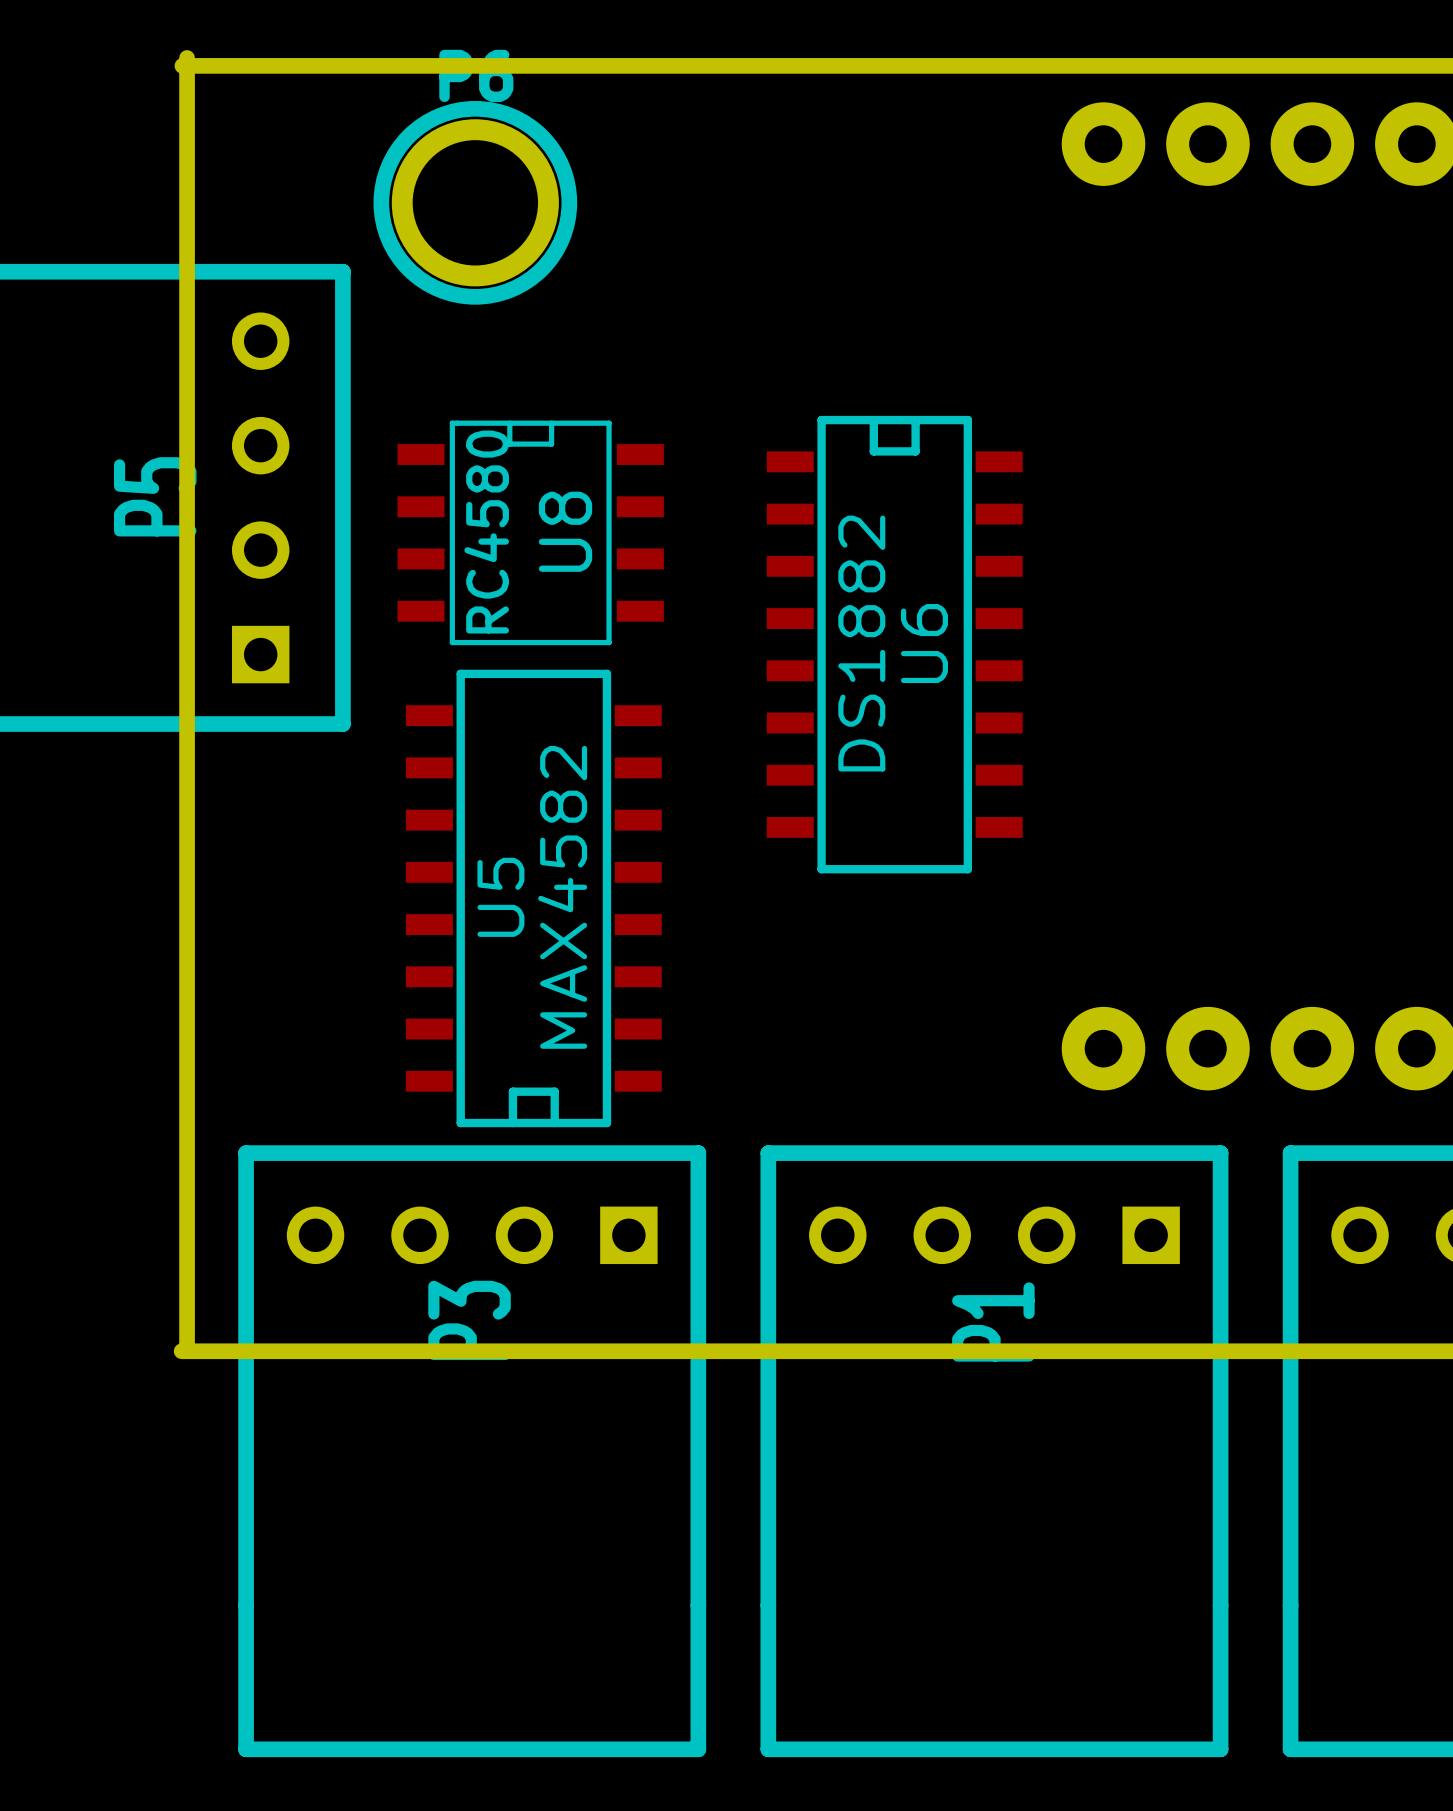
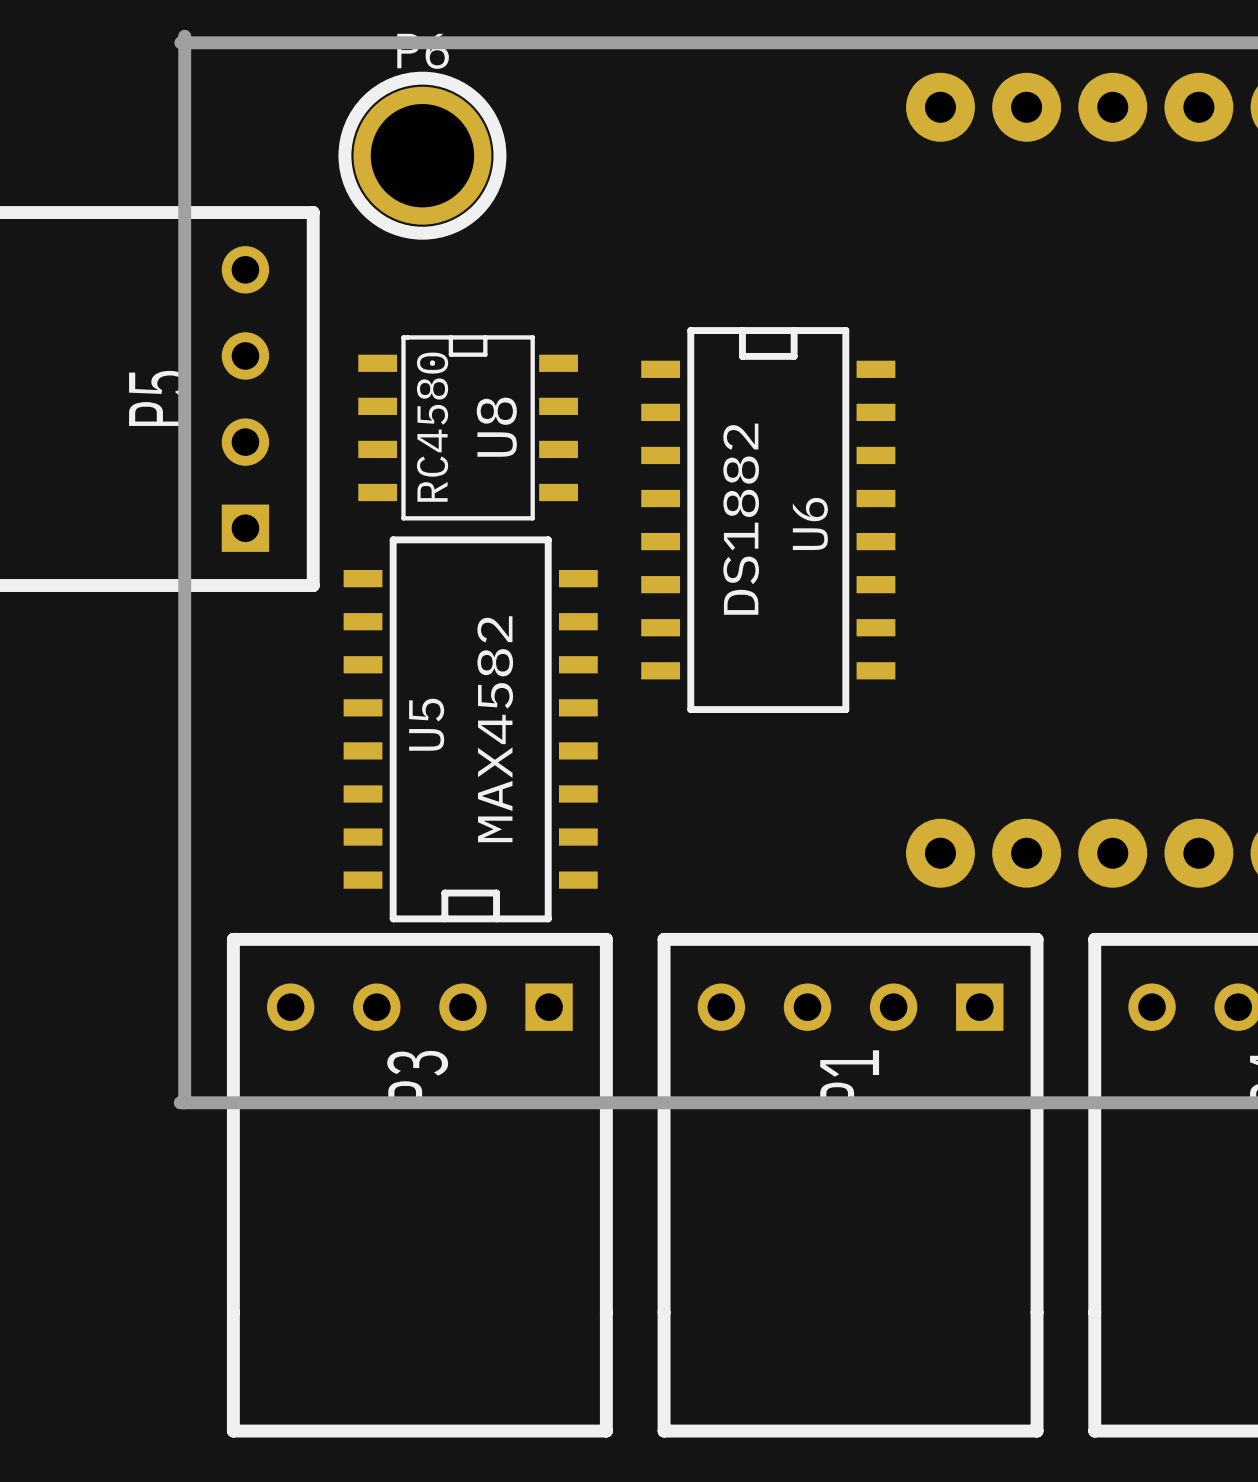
U6 footprint: [766, 415, 1023, 874] -> [641, 327, 896, 714]
U6 name position: U6 (924, 643) -> U6 (810, 523)
U5 footprint: [405, 669, 662, 1128] -> [343, 536, 598, 923]
U5 name position: U5 (500, 897) -> U5 (426, 724)

